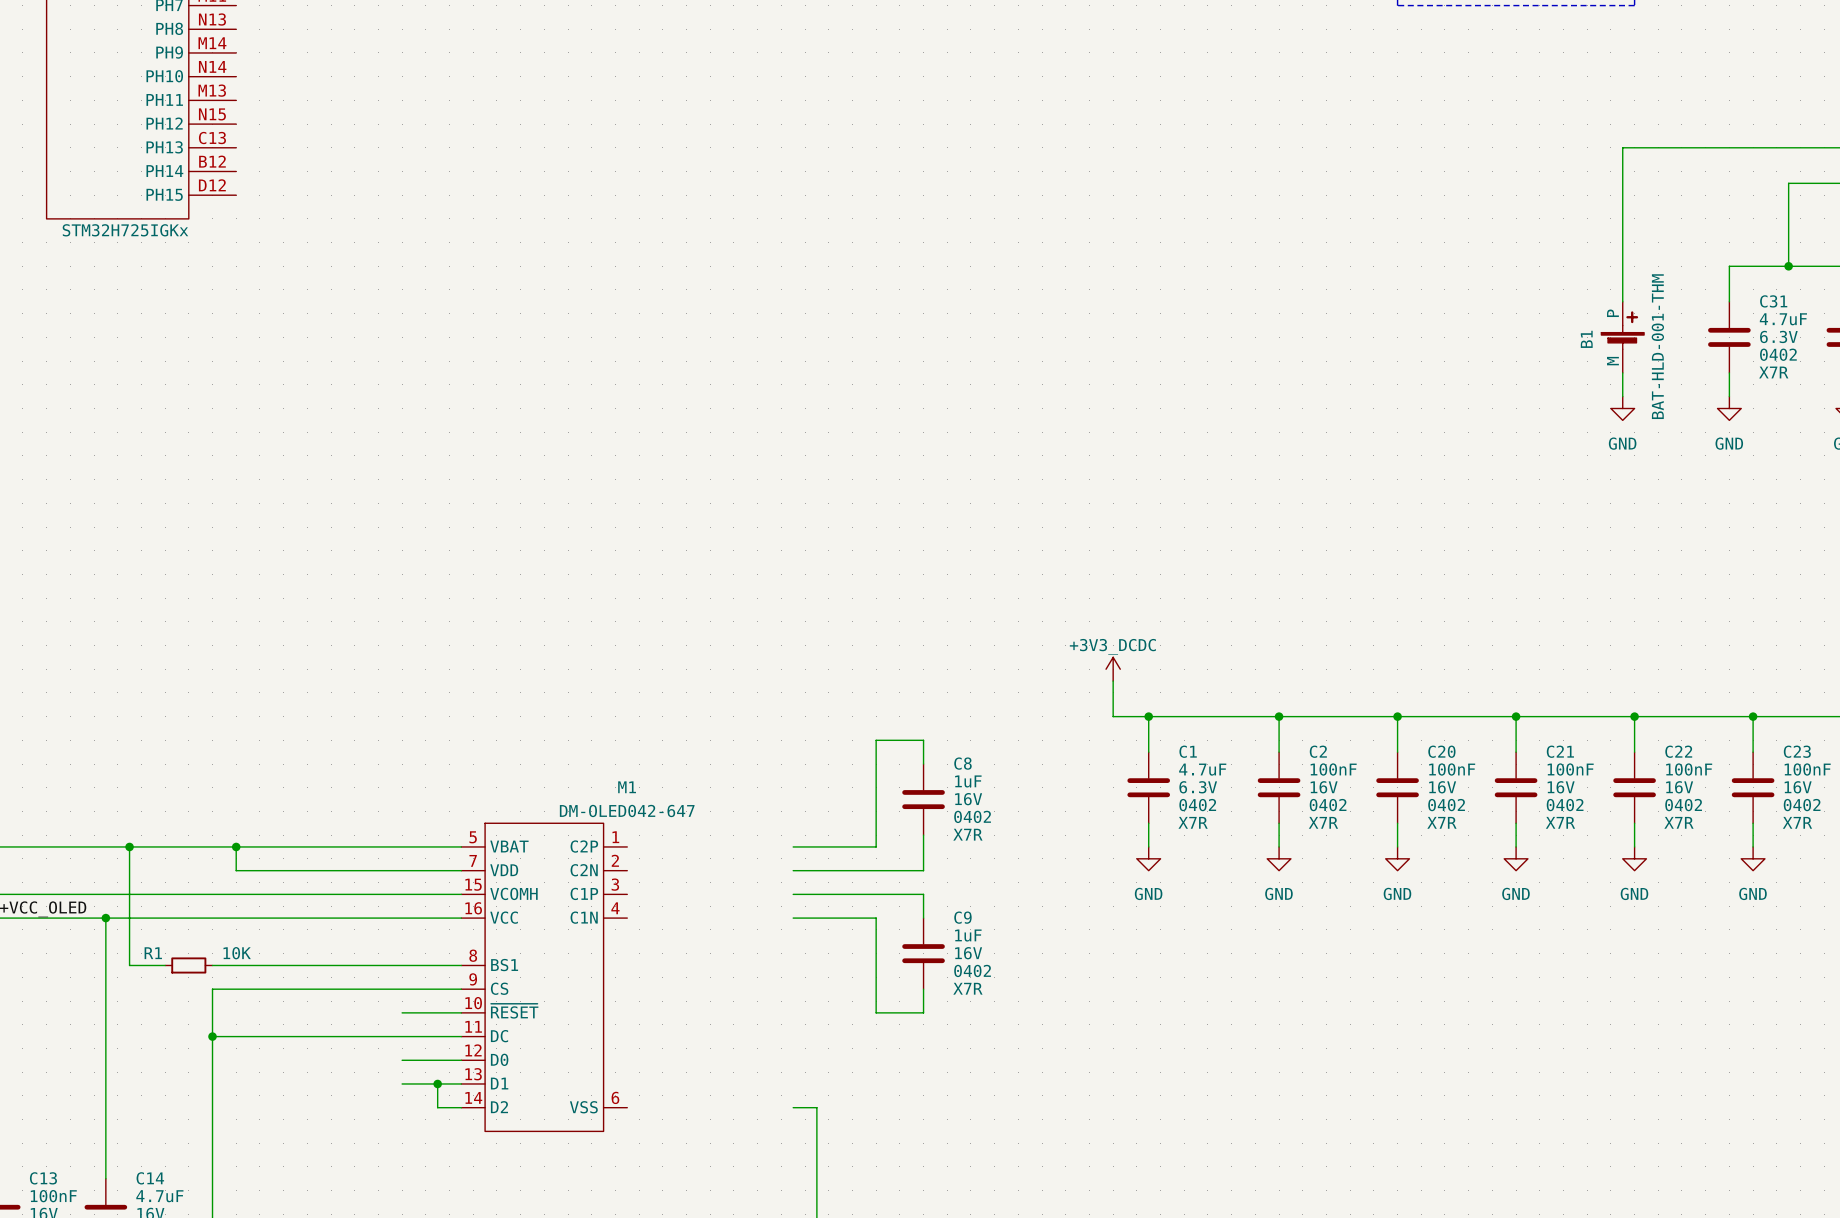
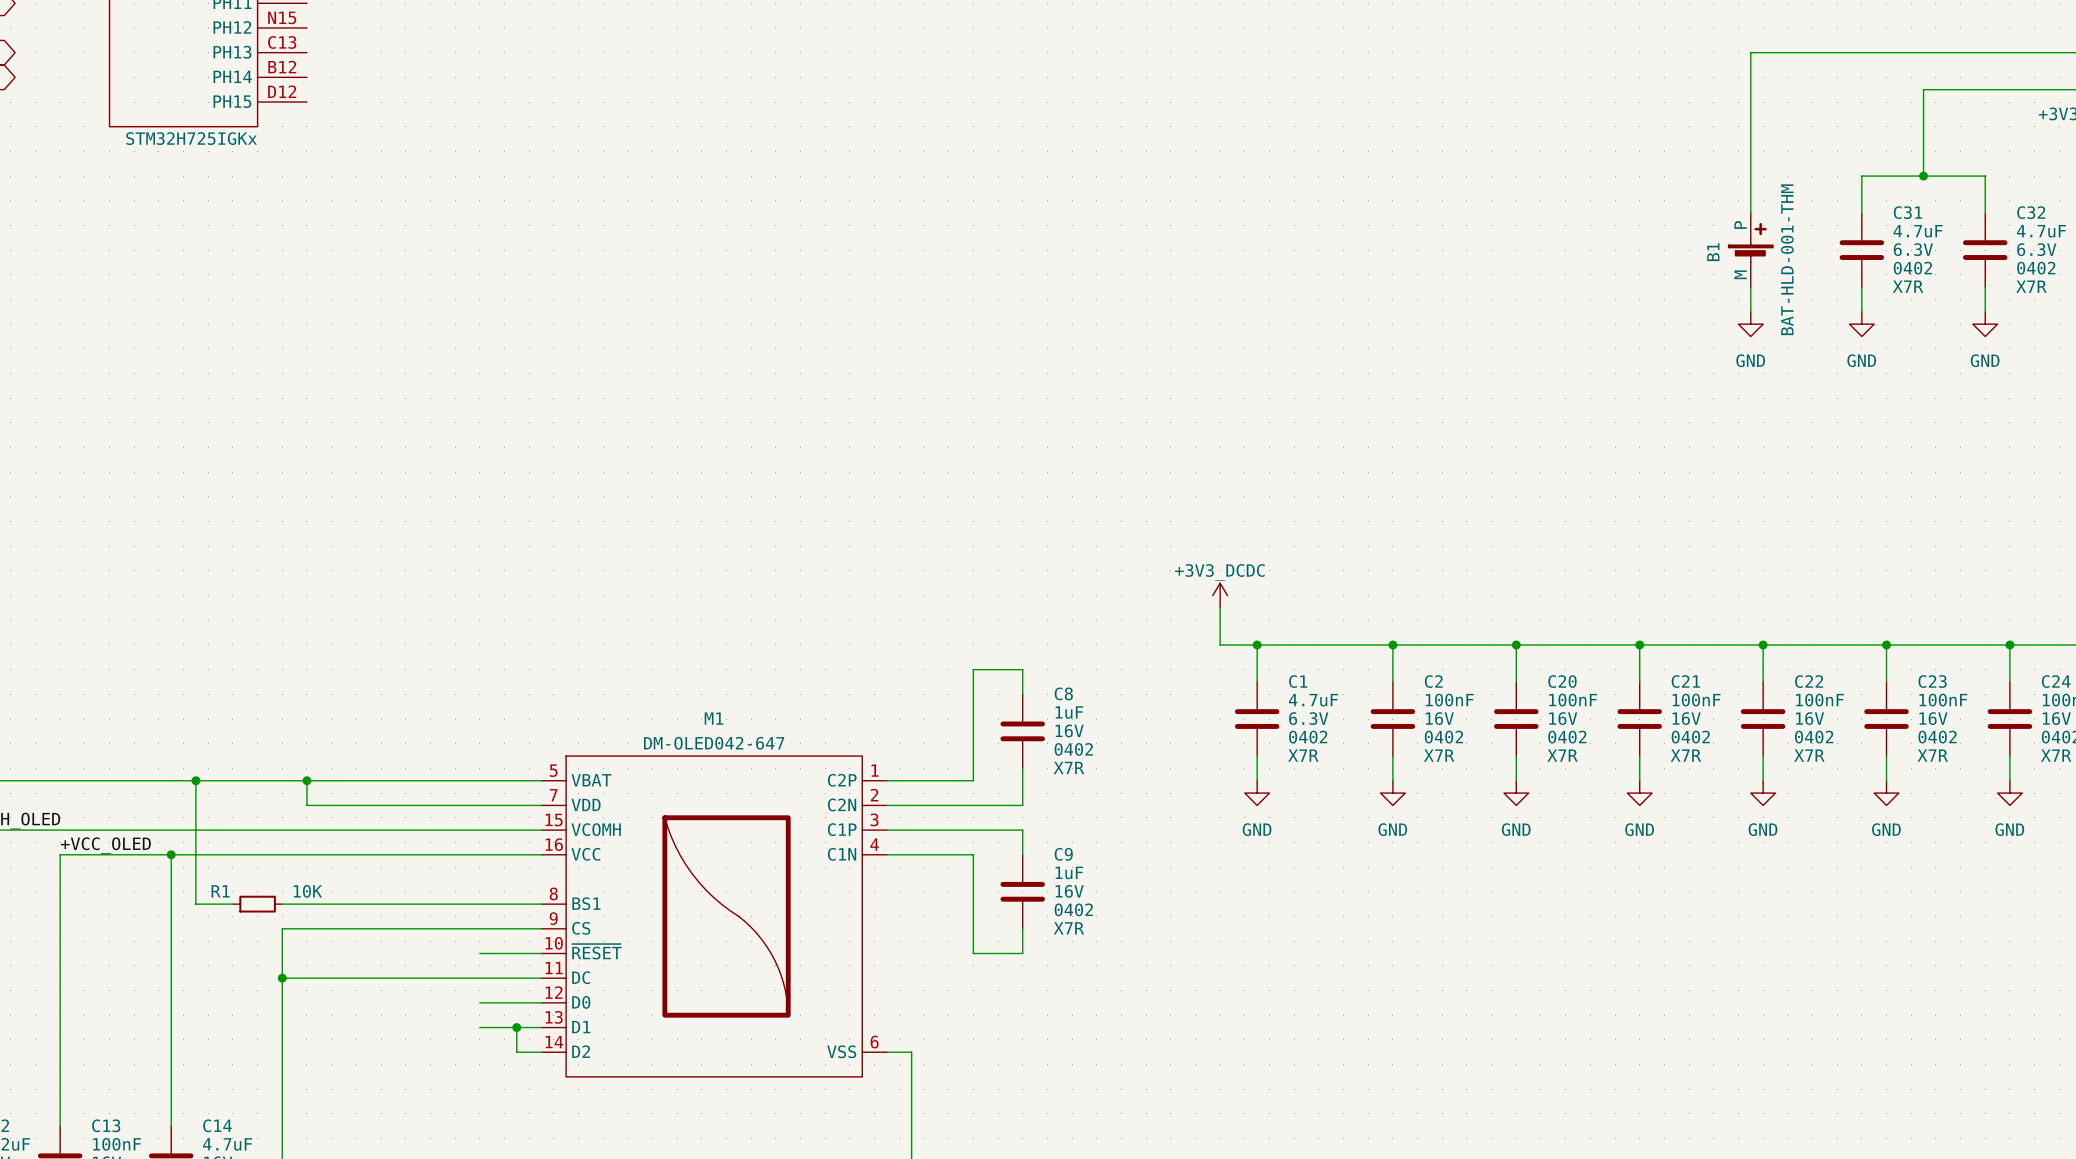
M1 symbol: [461, 823, 628, 1132] -> [541, 756, 887, 1077]

